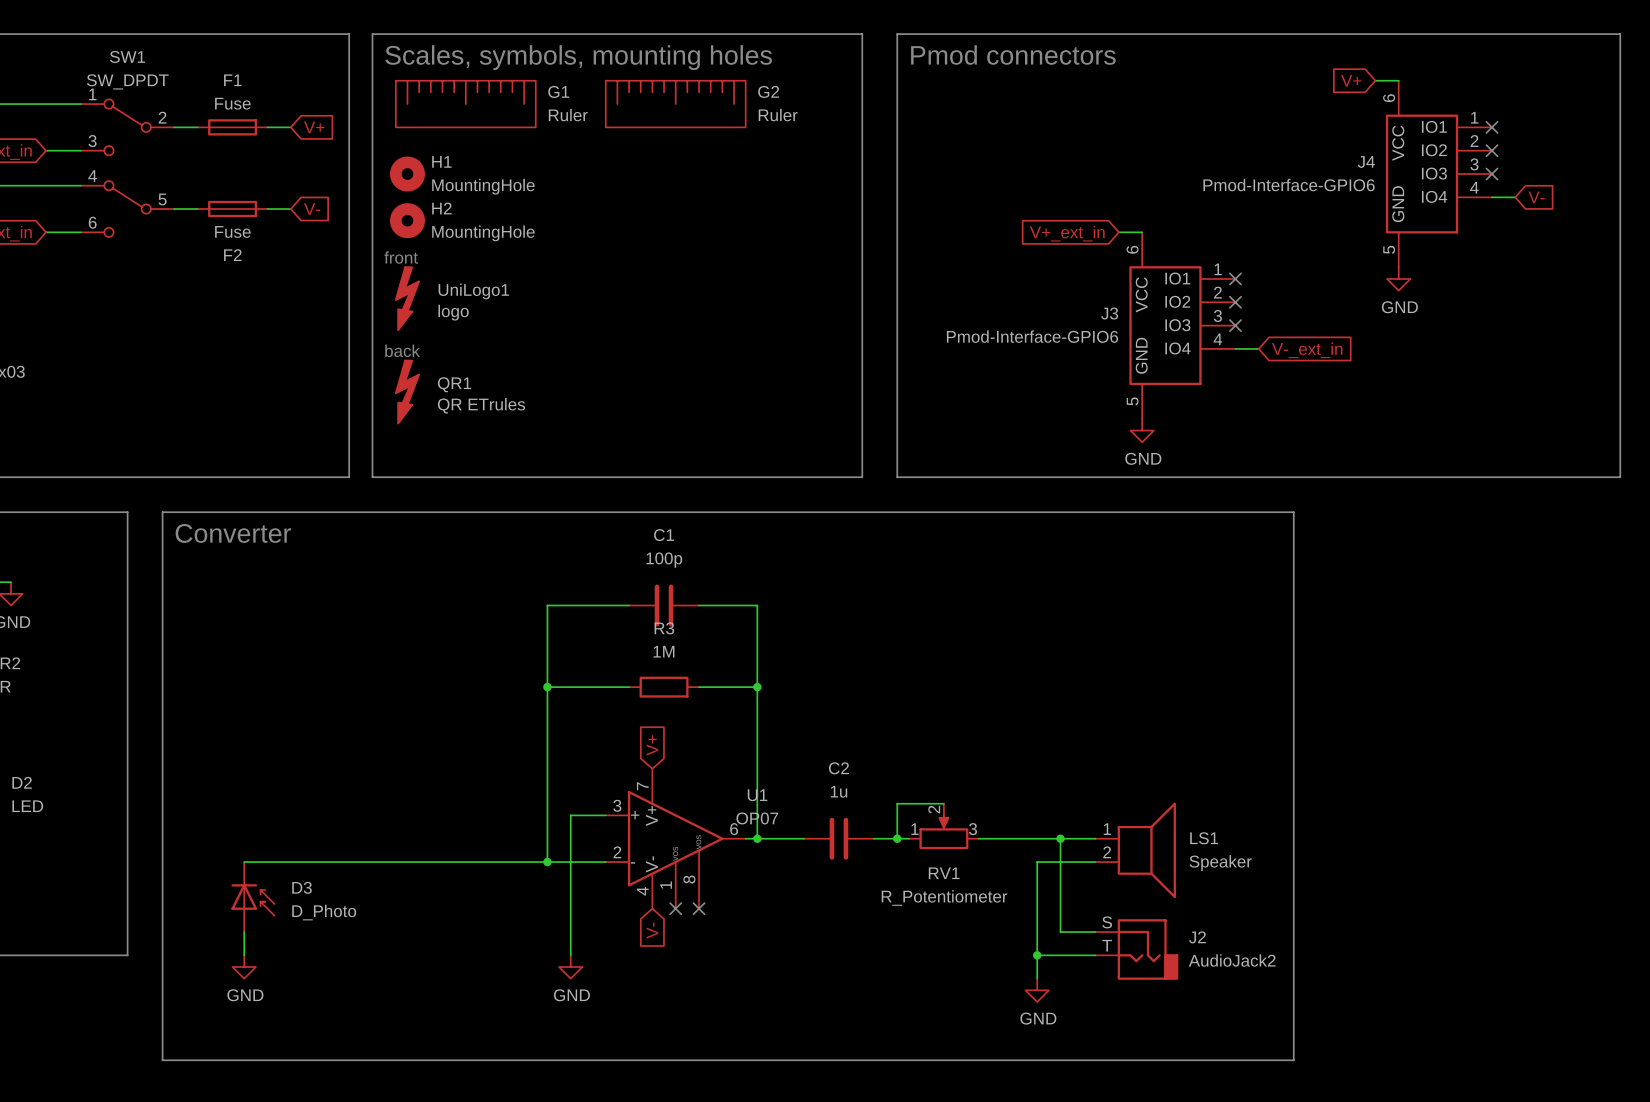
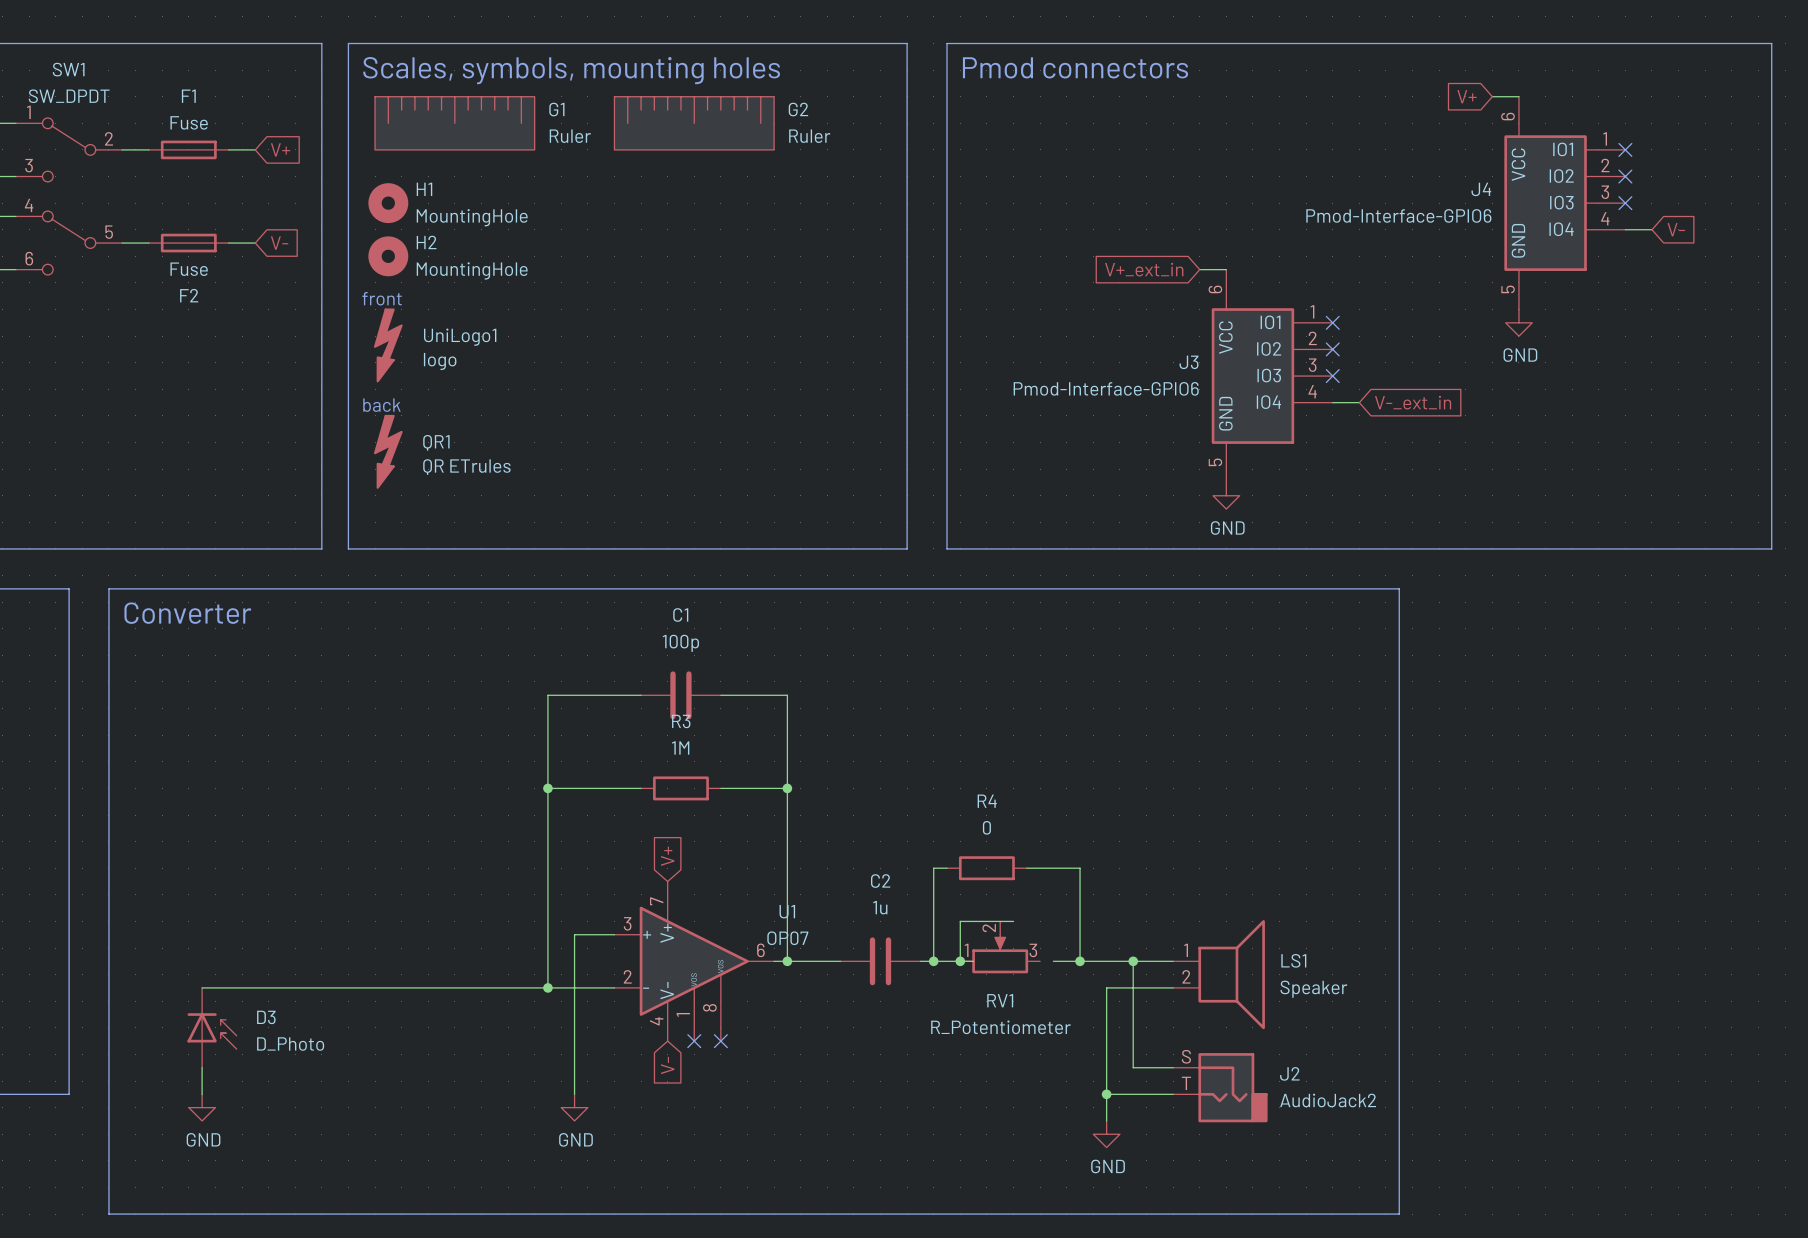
wire: none -> (947, 868) (933, 868) (933, 961)
R4: none -> 0 (986, 868)
wire: none -> (1026, 868) (1080, 868) (1080, 961)
wire: (908, 803) (897, 803) (897, 838) -> (960, 921) (960, 961) (973, 961)
junction: none -> (933, 961)
junction: (897, 838) -> none
junction: none -> (960, 961)
wire: (978, 838) (990, 838) -> (1000, 921) (1013, 921)
junction: none -> (1080, 961)

